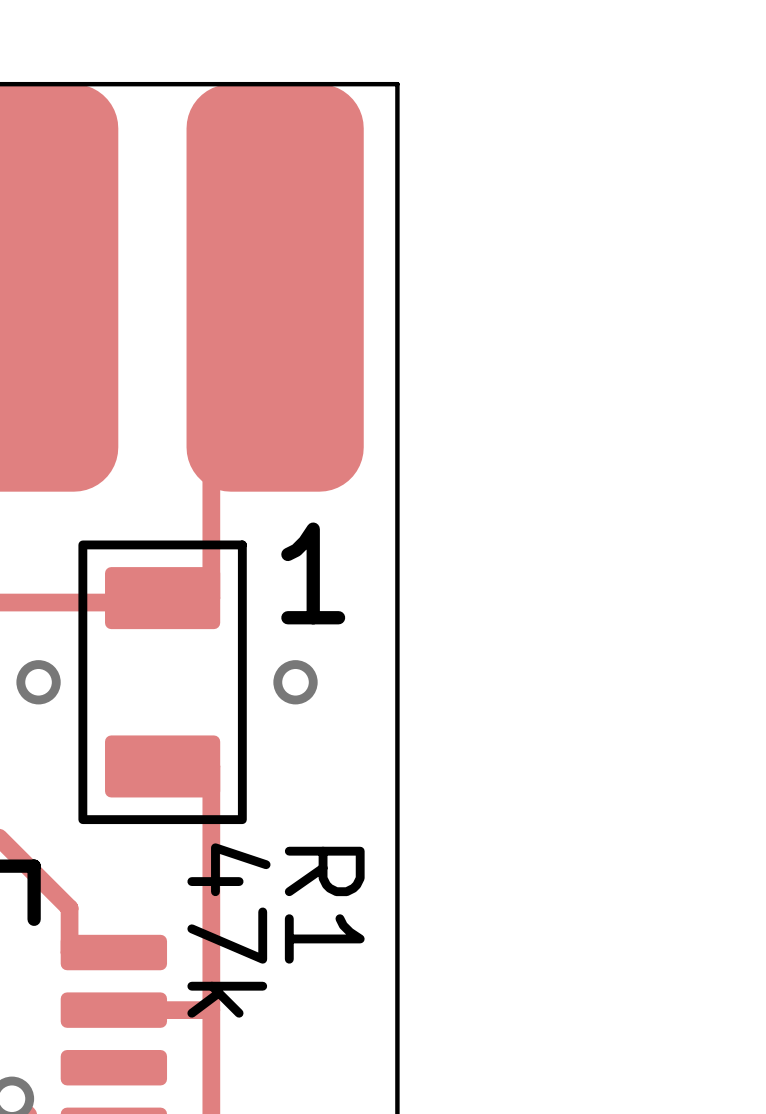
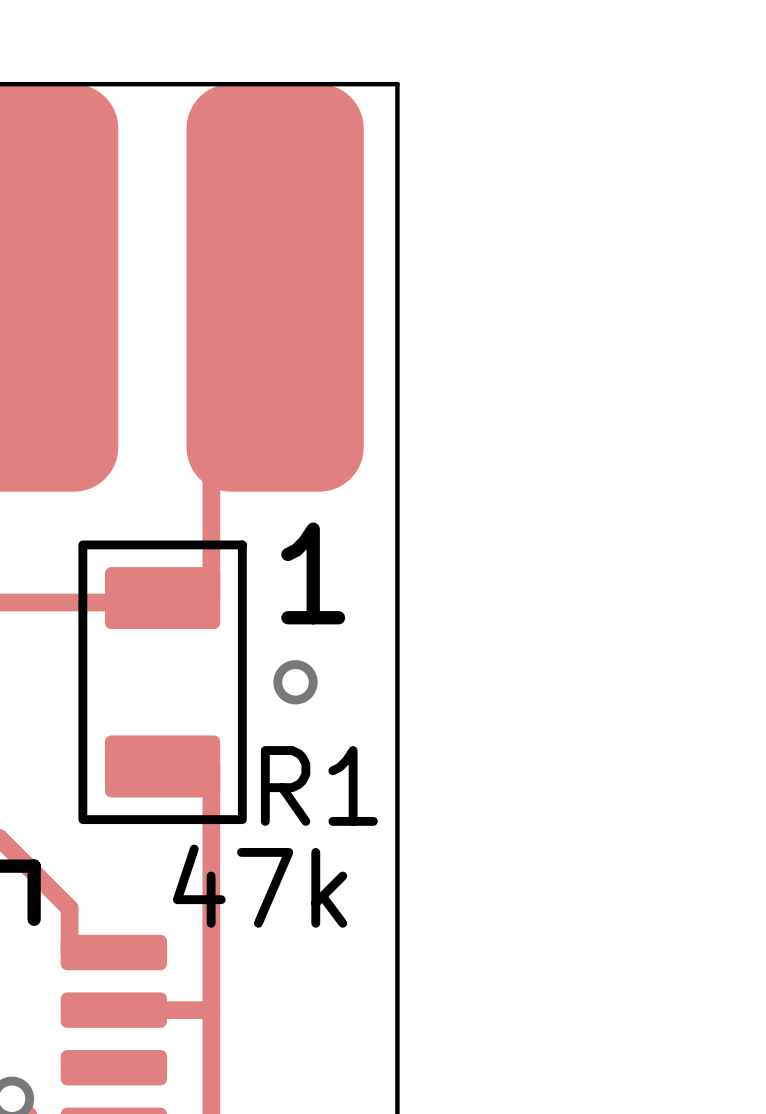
via: (38, 682) -> none
R1 name rotation: 0° (324, 905) -> 90° counterclockwise (319, 785)
R1 value rotation: 0° (228, 930) -> 90° counterclockwise (260, 886)

